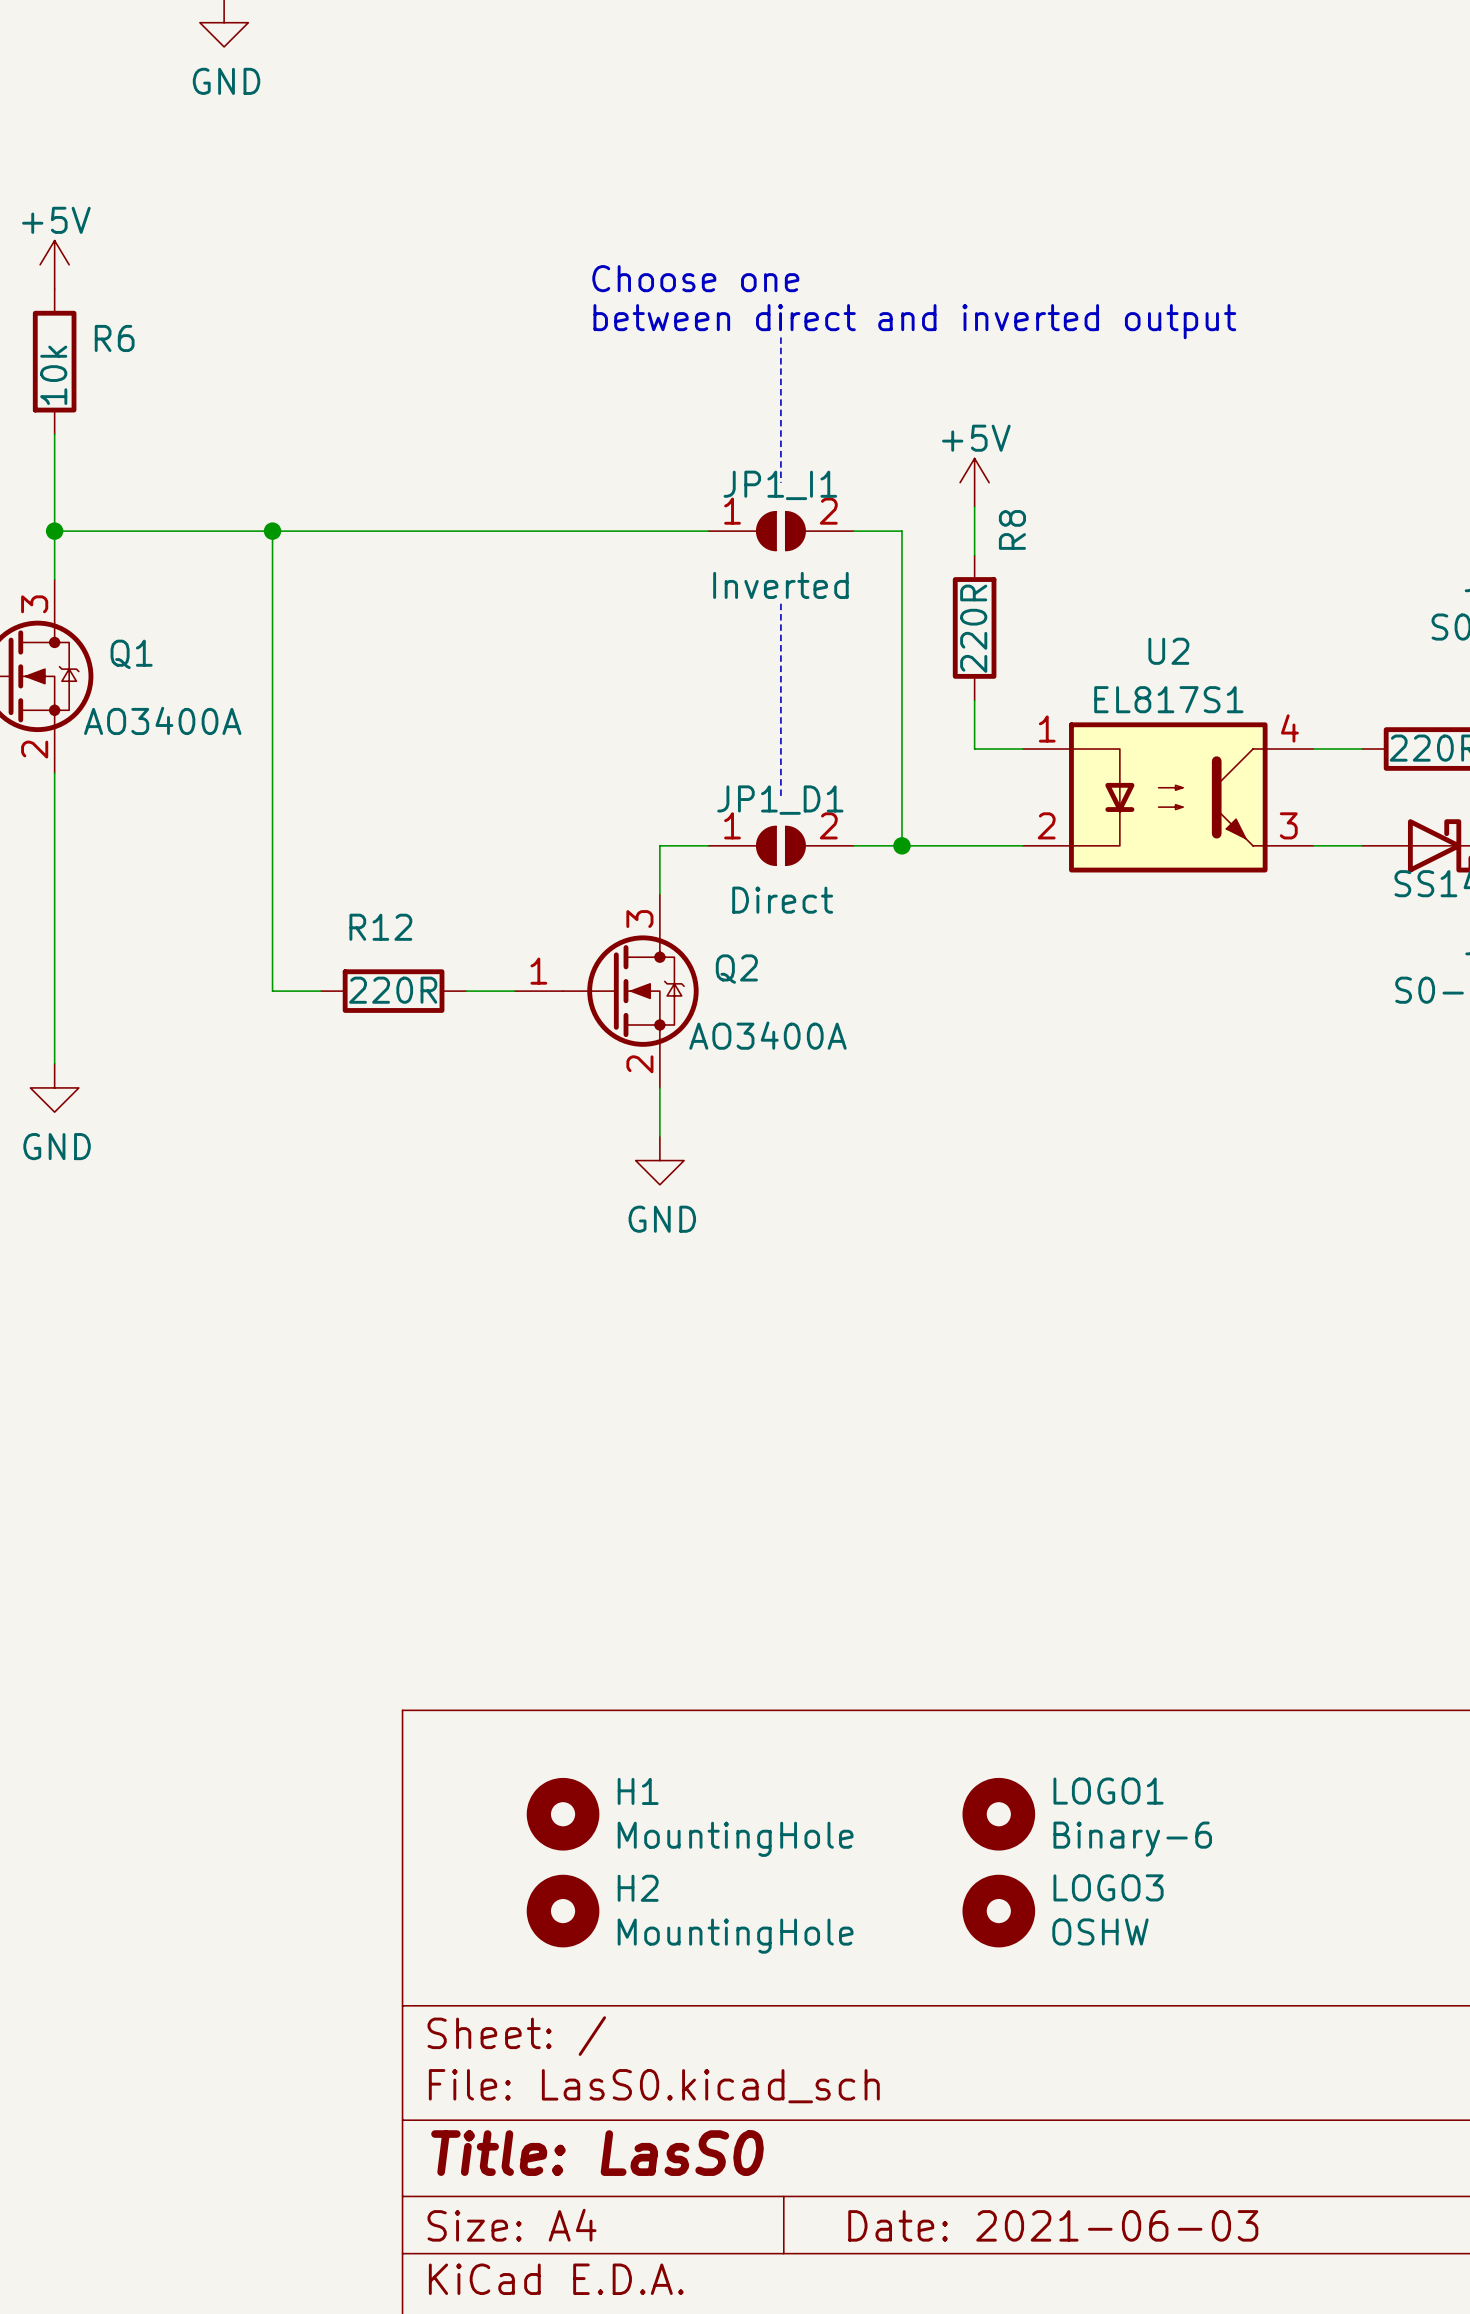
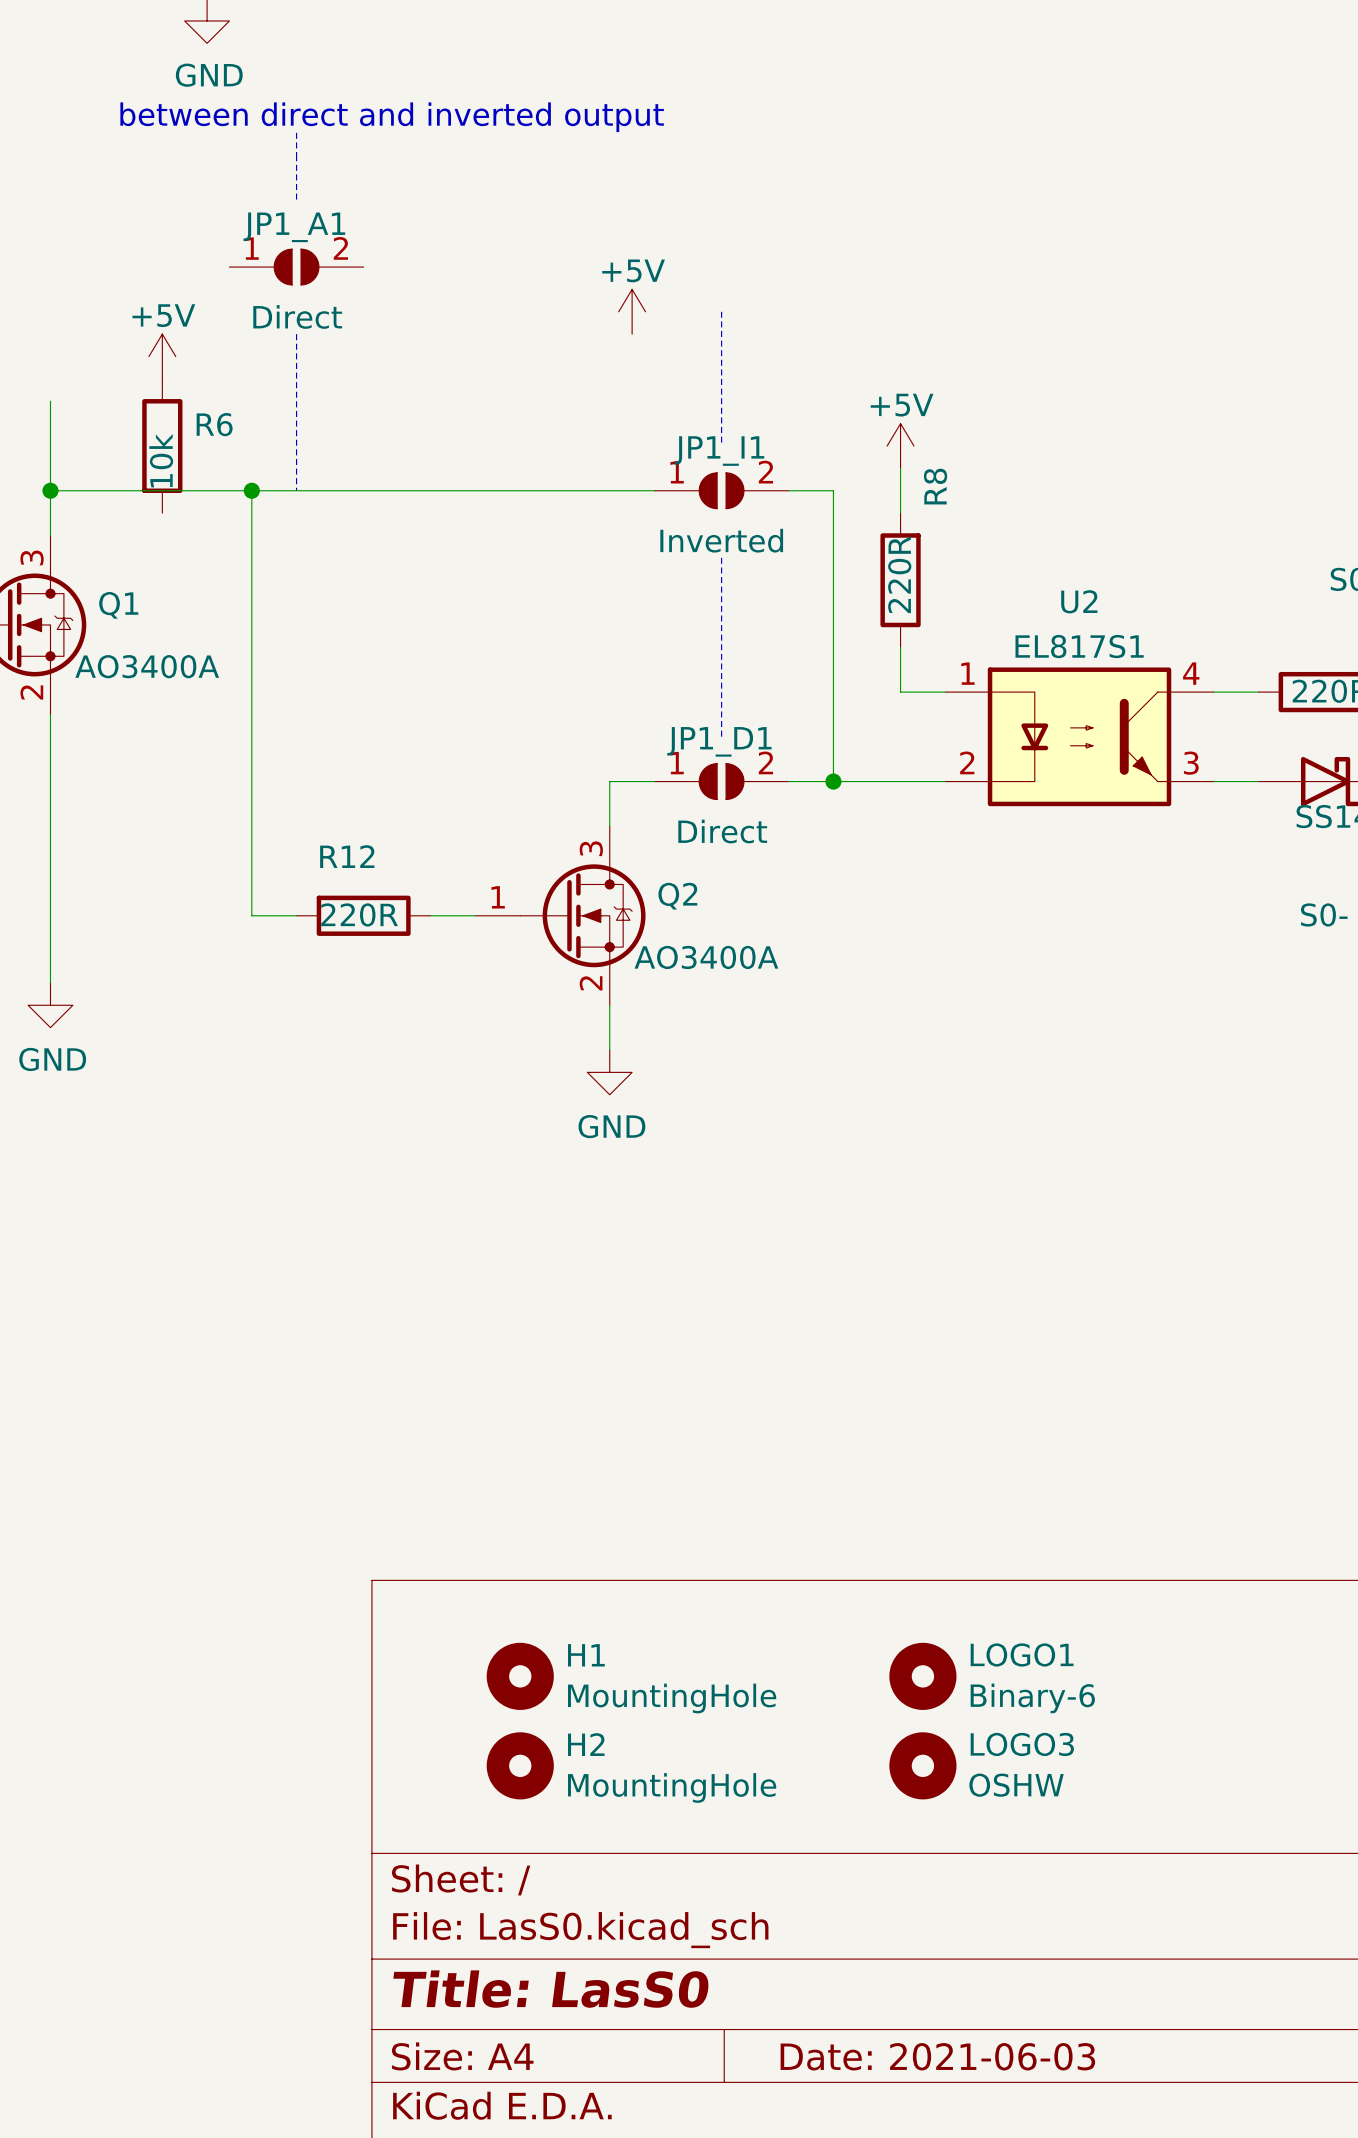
text: none -> between direct and inverted output (392, 117)
line: none -> (296, 132) (296, 199)
power symbol position: +5V (54, 264) -> +5V (162, 356)
text: Choose one (695, 278) -> none
JP1_A1: none -> Direct (296, 267)
text: between direct and inverted output (914, 321) -> none
power symbol: none -> +5V (632, 311)
R6 position: (54, 361) -> (162, 446)
line: none -> (296, 334) (296, 490)

